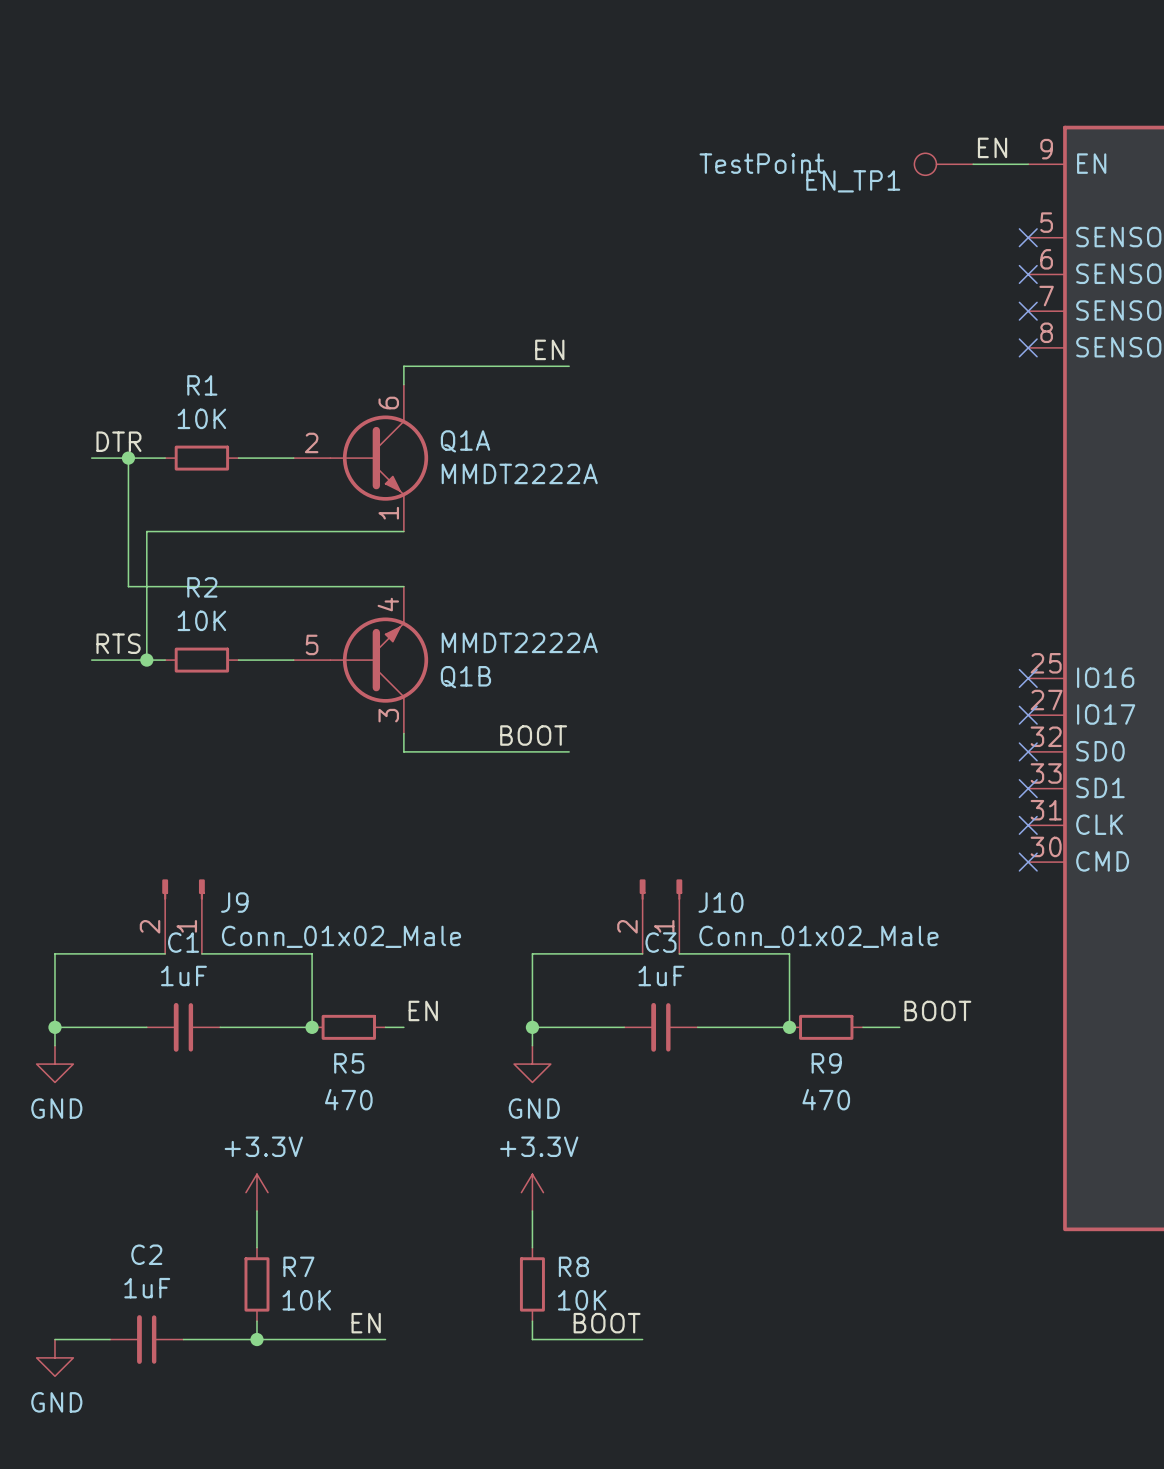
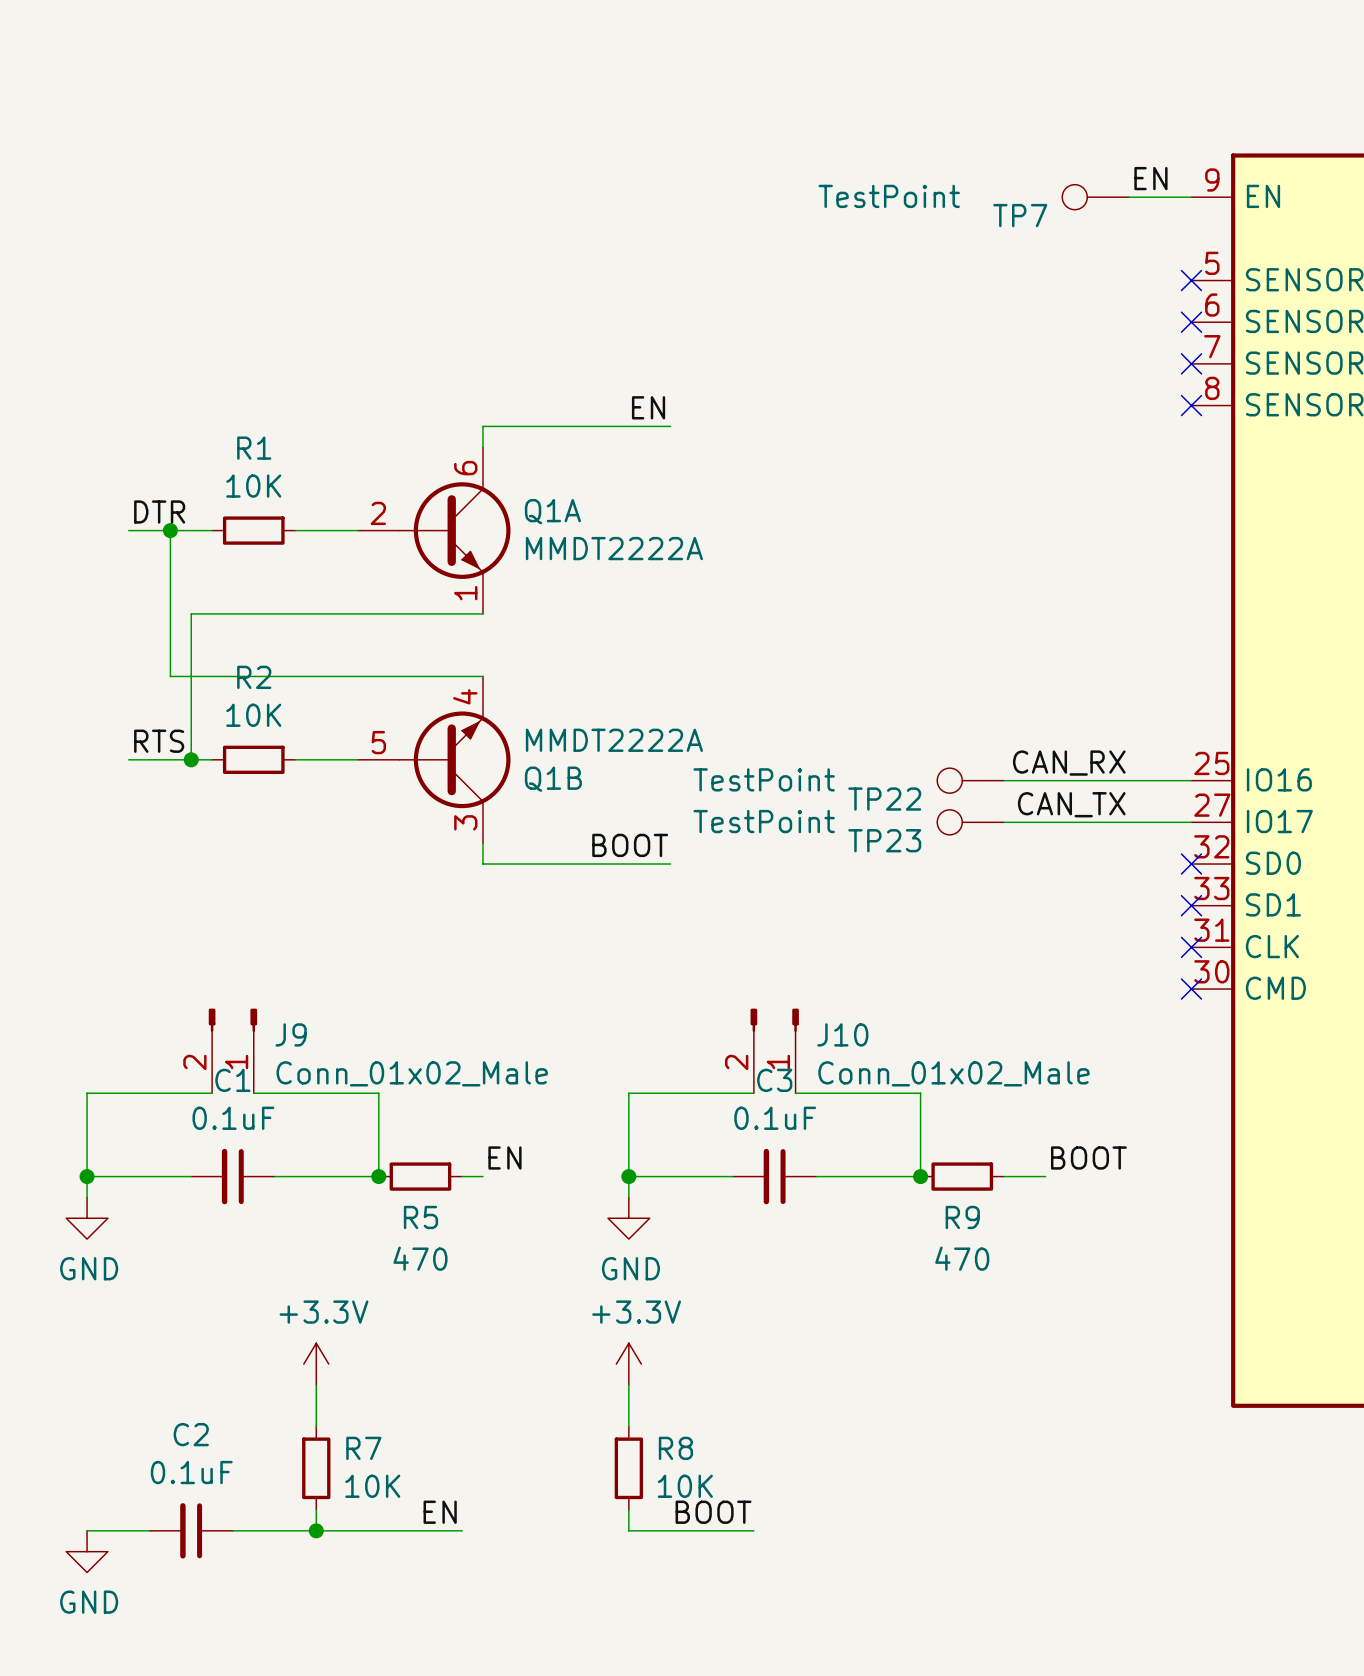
EN_TP1 name: EN_TP1 (853, 181) -> TP7 (1020, 215)
label: none -> CAN_RX (1069, 763)
TP22: none -> TestPoint (970, 780)
wire: none -> (1003, 780) (1191, 780)
no-connect mark: (1028, 678) -> none
label: none -> CAN_TX (1071, 804)
TP23: none -> TestPoint (970, 822)
wire: none -> (1003, 822) (1191, 822)
no-connect mark: (1028, 715) -> none
C1 value: 1uF (183, 975) -> 0.1uF (233, 1118)
C3 value: 1uF (661, 975) -> 0.1uF (775, 1118)
C2 value: 1uF (147, 1288) -> 0.1uF (191, 1472)

